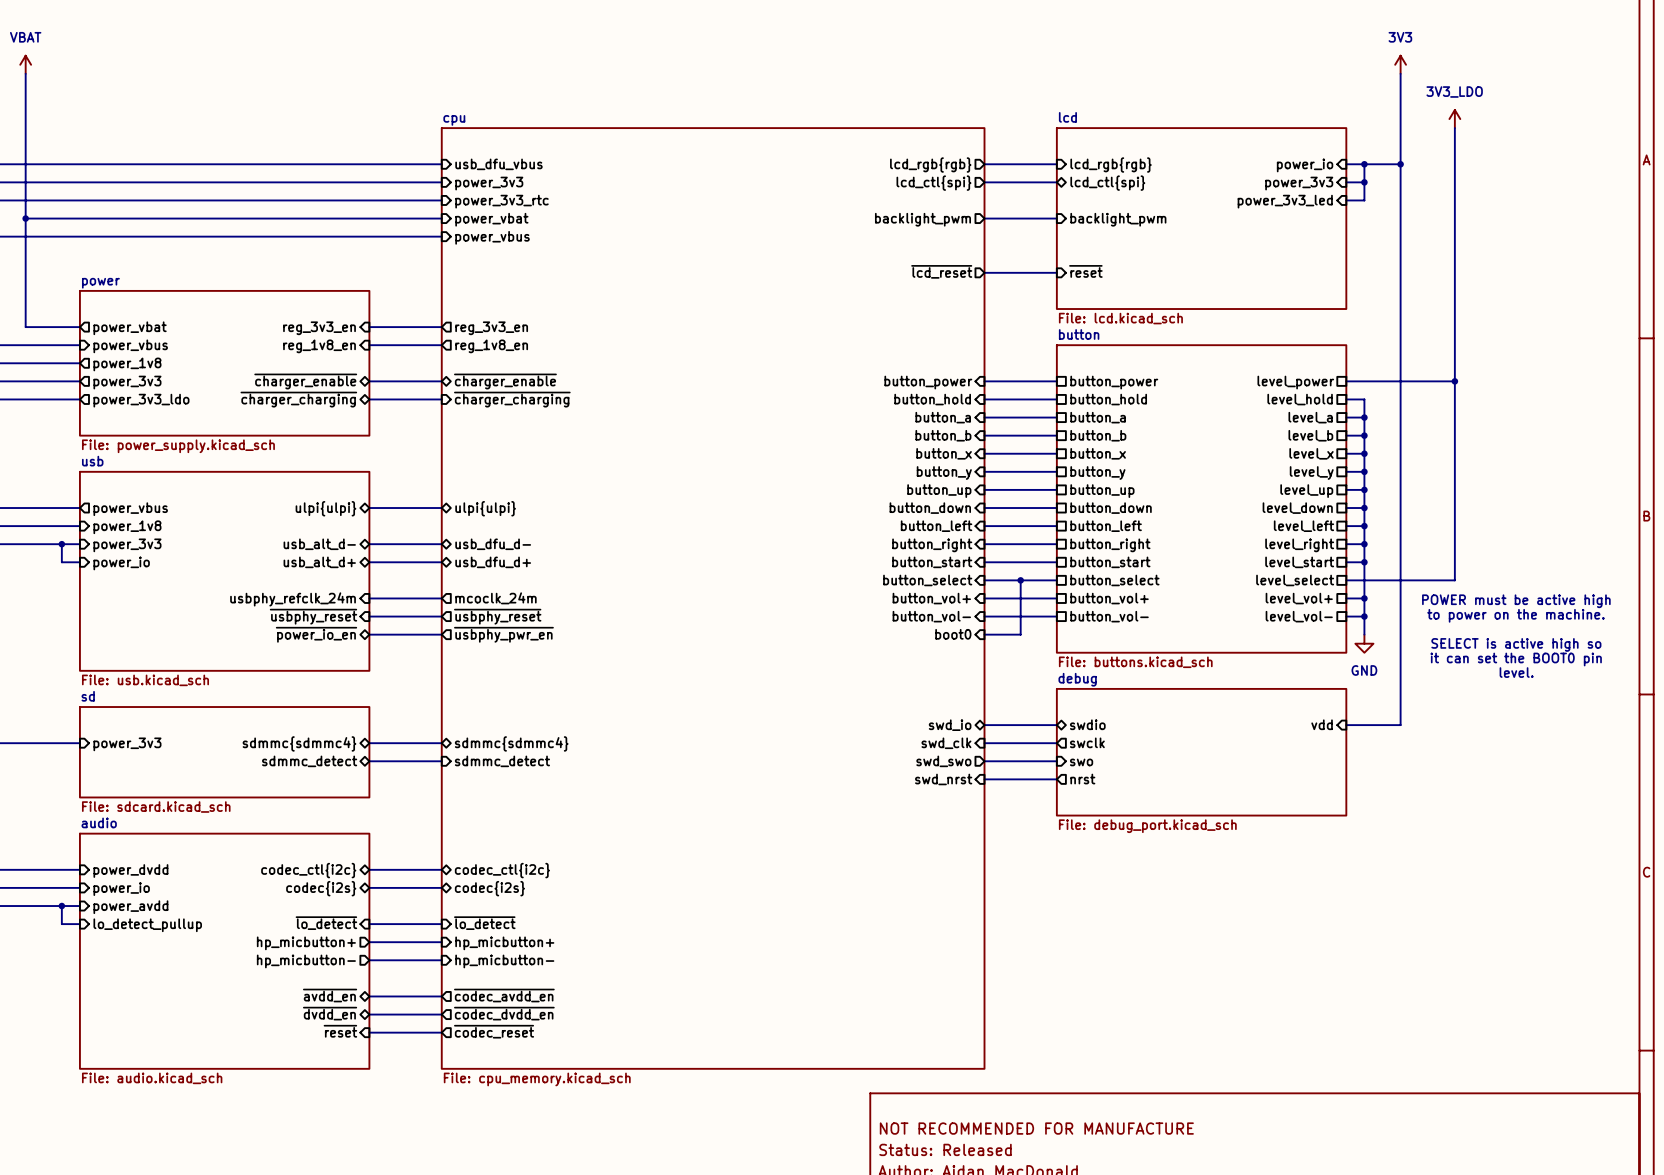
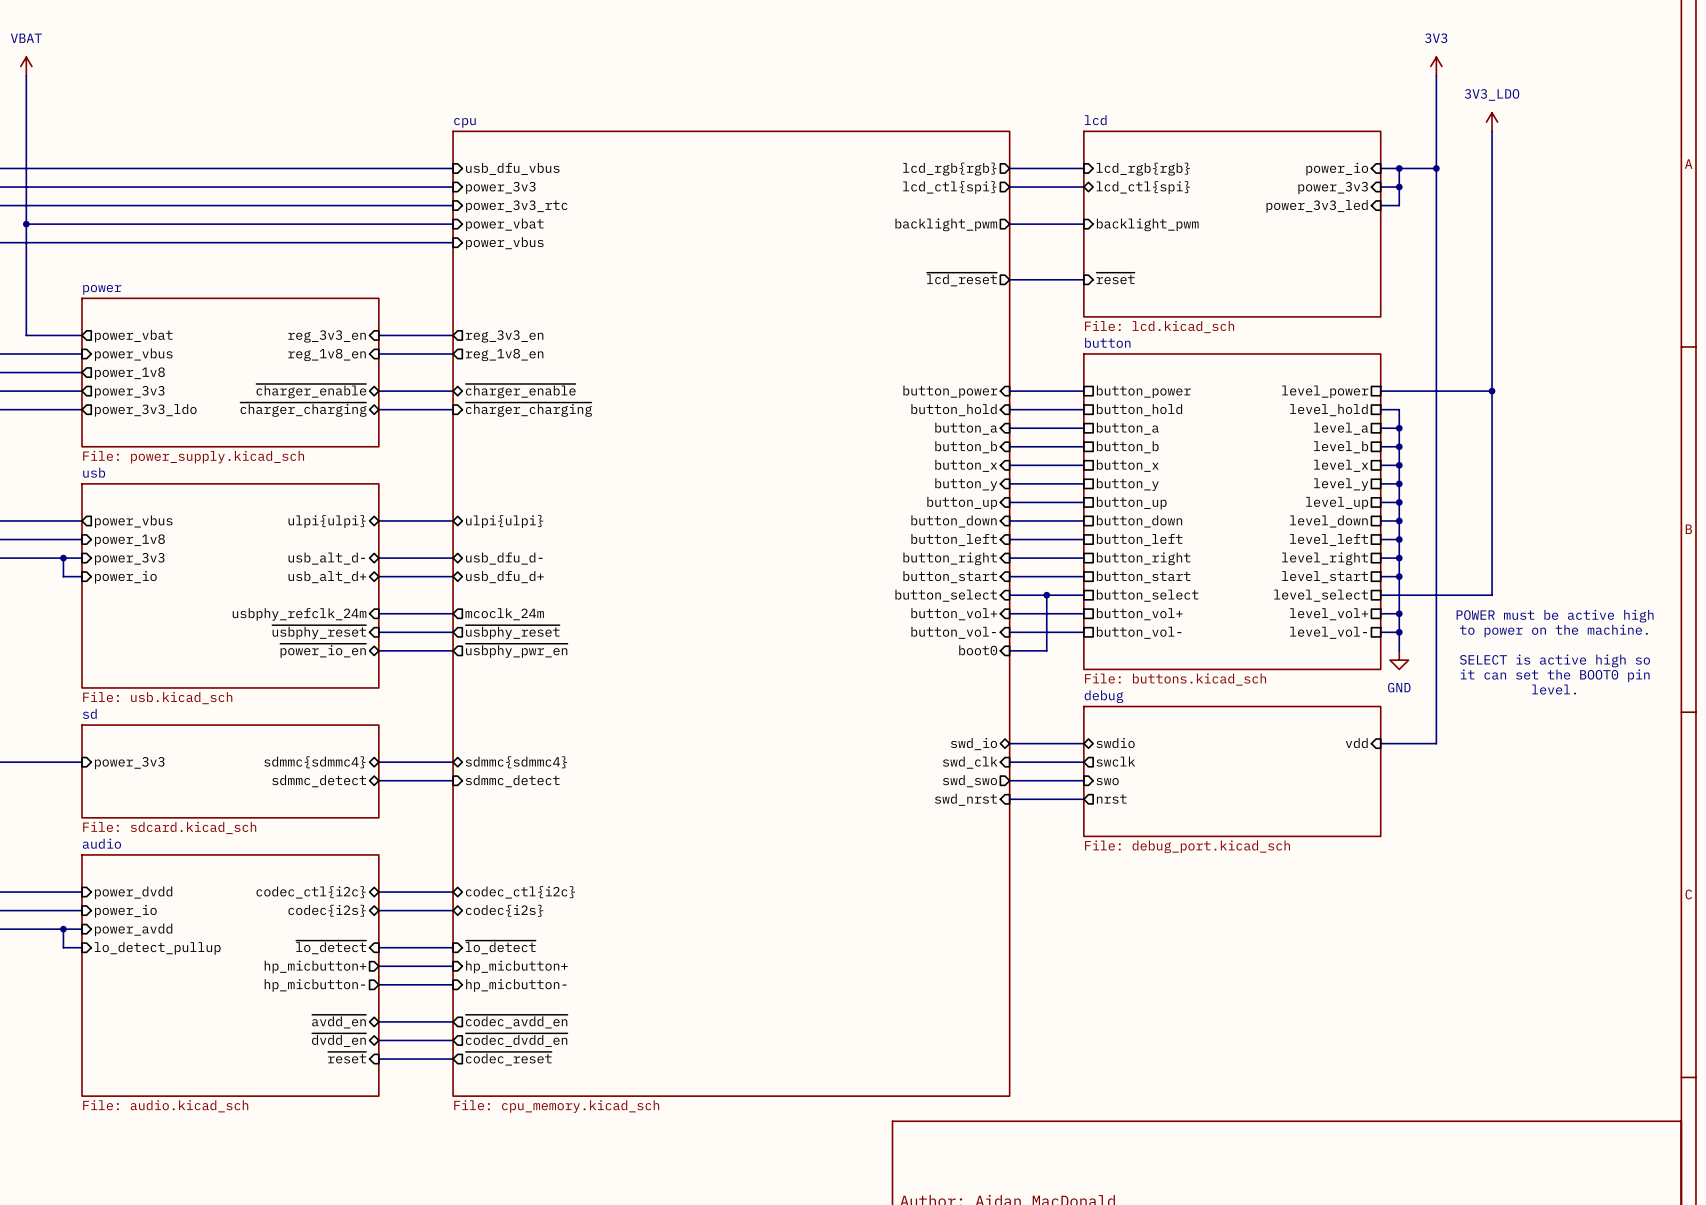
title block: NOT RECOMMENDED FOR MANUFACTURE (1036, 1128) -> none
title block: Status: Released (945, 1149) -> none

